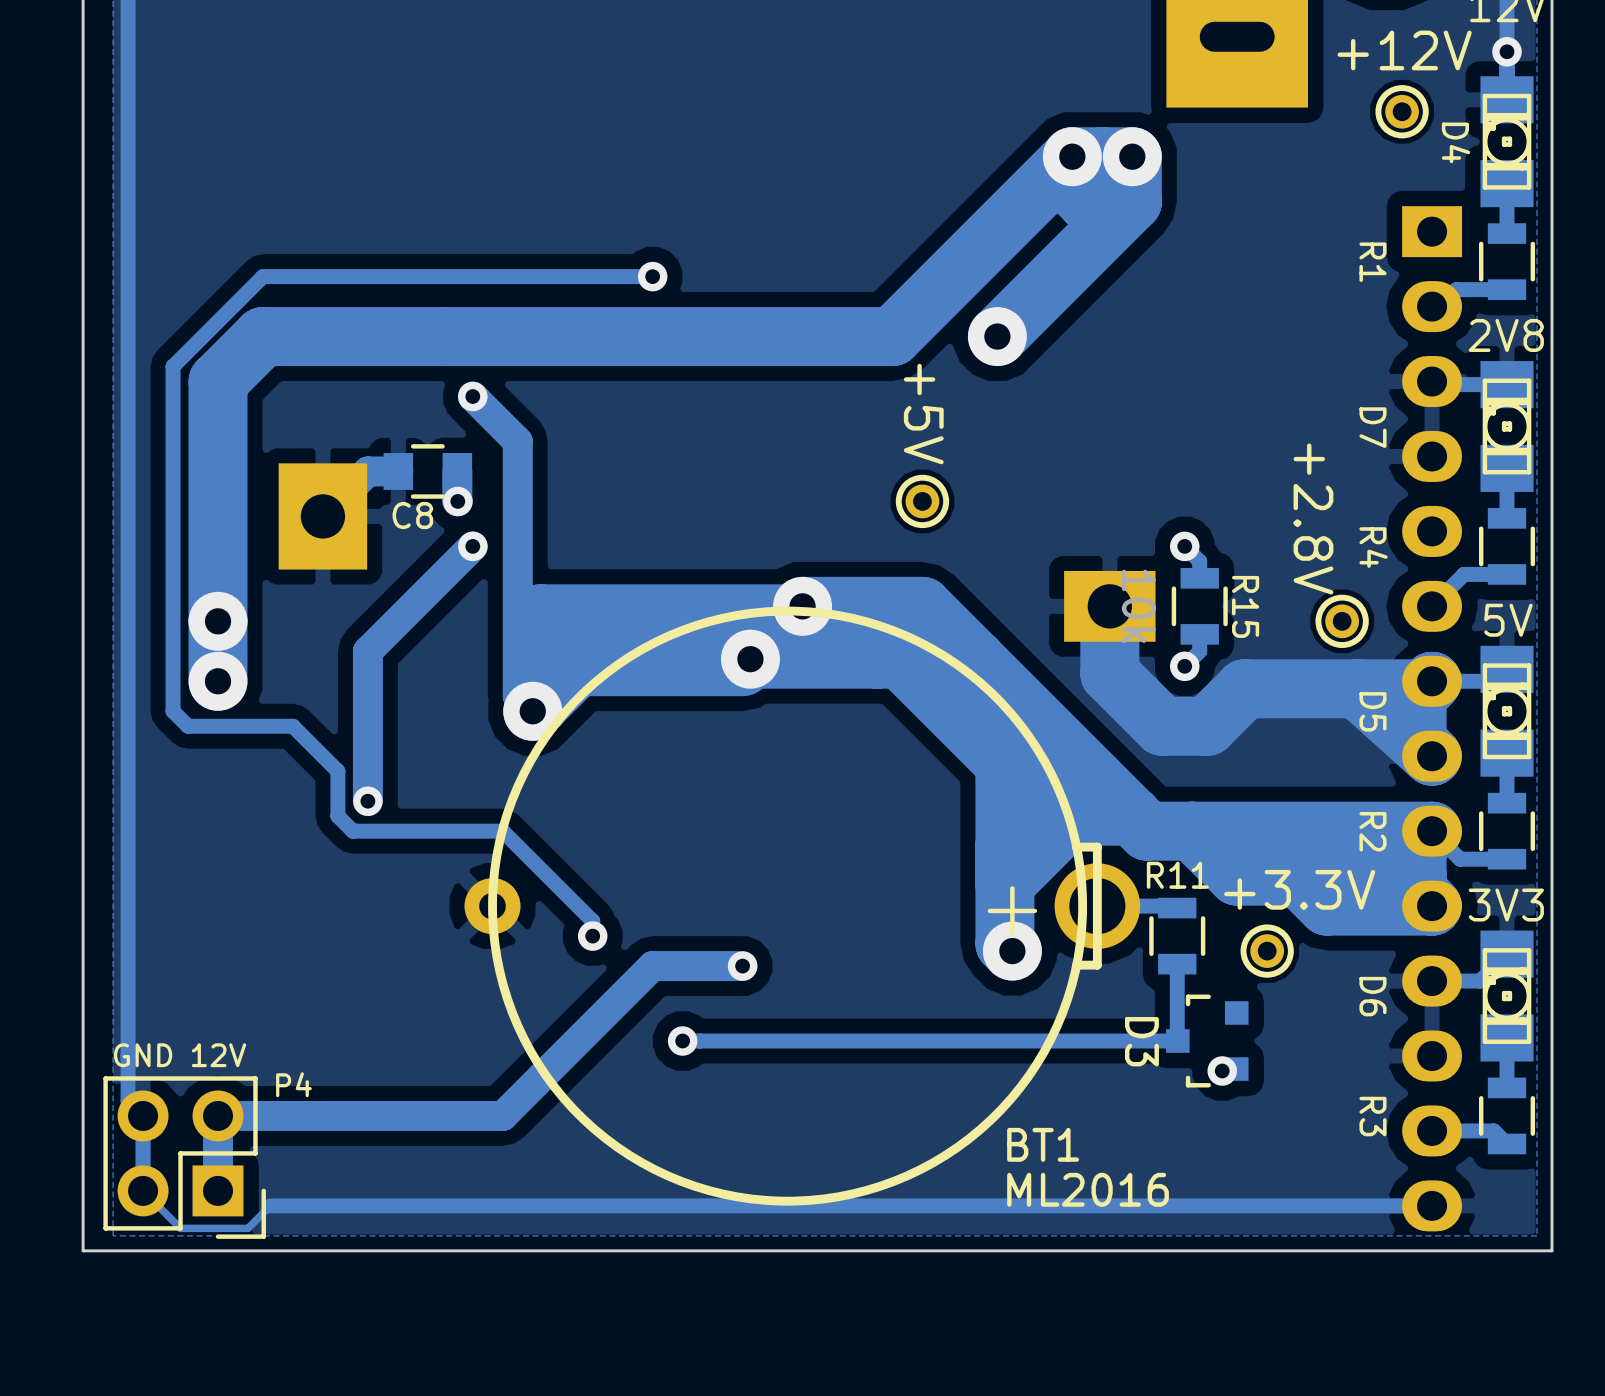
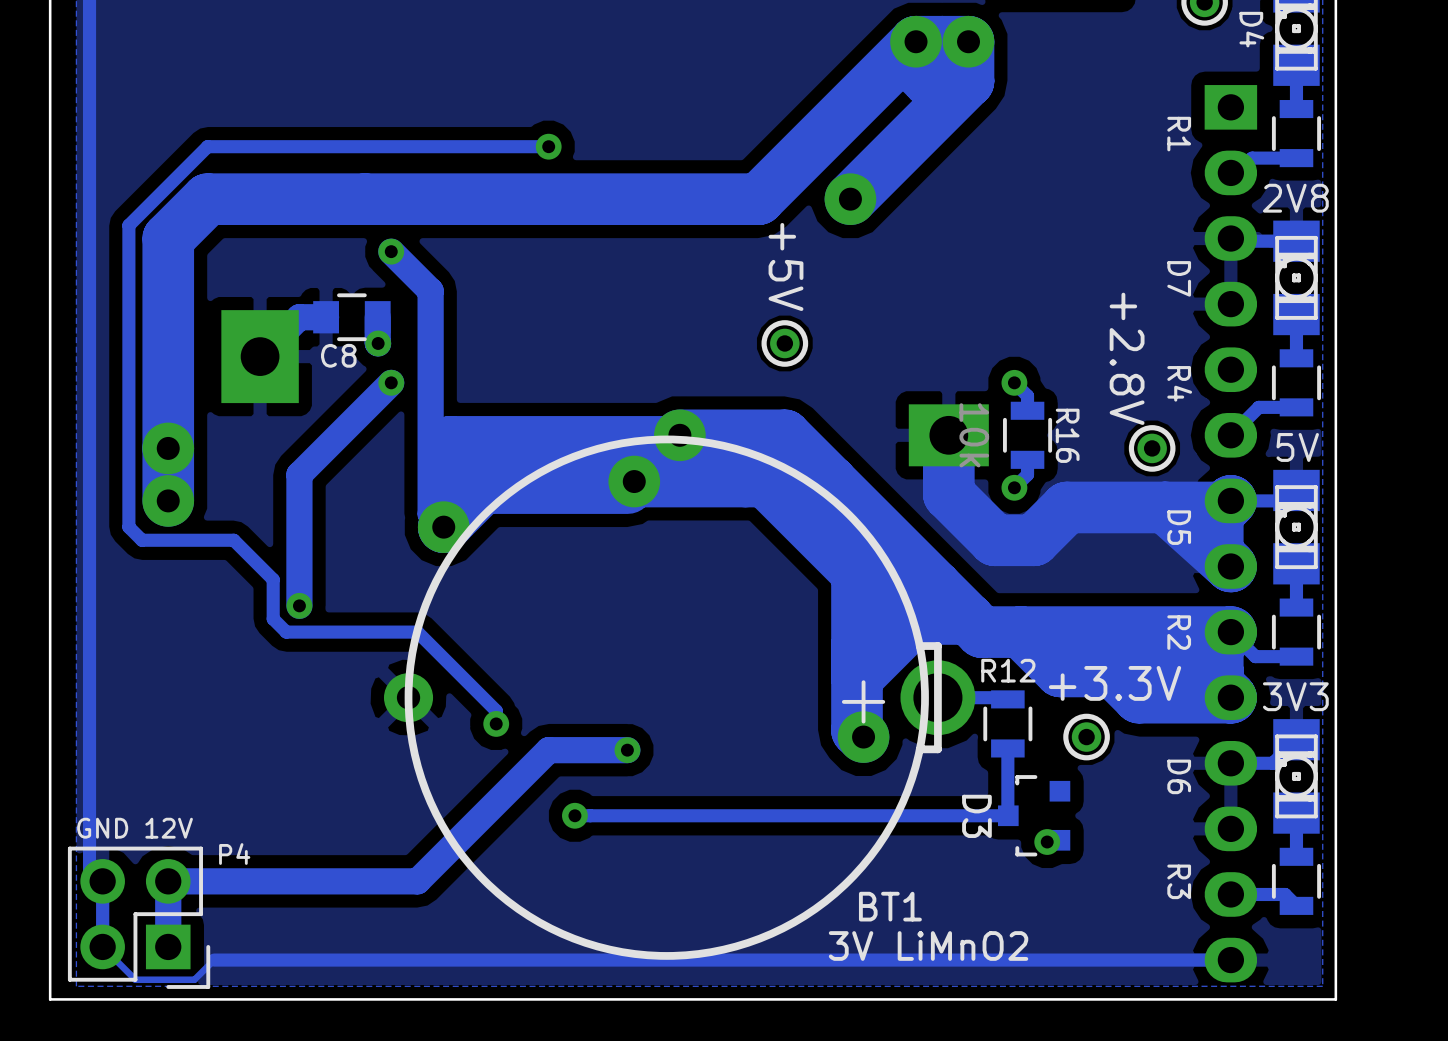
R15 name: R15 (1245, 606) -> R16 (1067, 435)
R11 name: R11 (1177, 875) -> R12 (1008, 670)
BT1 value: ML2016 (1088, 1189) -> 3V LiMnO2 (928, 945)

